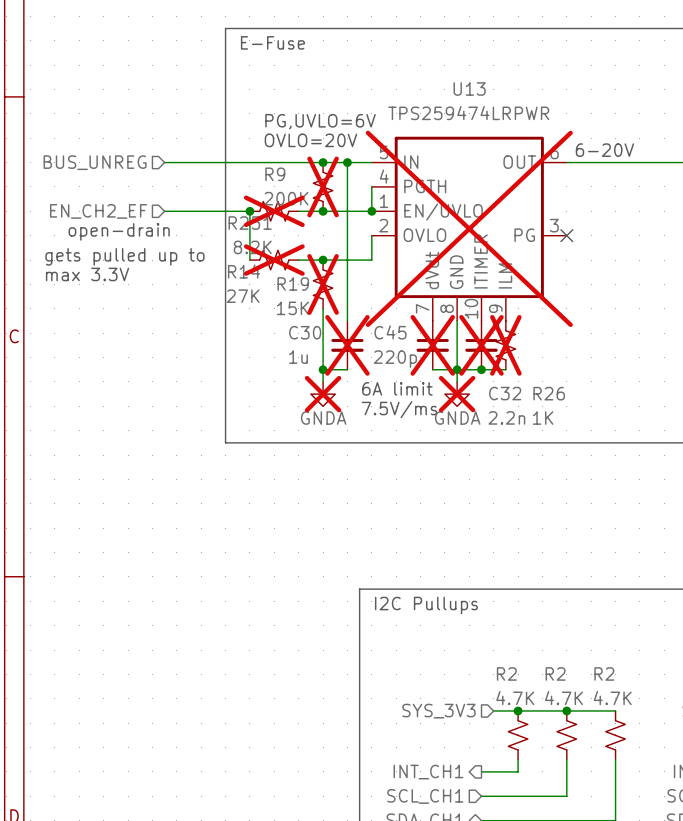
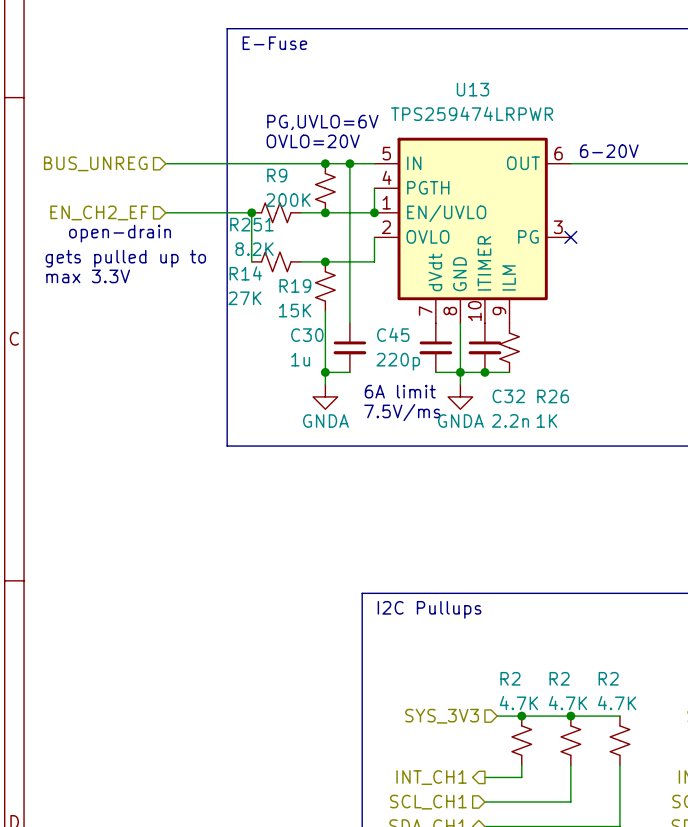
R9 do-not-place cross: (323, 186) -> none
R251 do-not-place cross: (274, 211) -> none
U13 do-not-place cross: (469, 228) -> none
R14 do-not-place cross: (274, 260) -> none
R19 do-not-place cross: (323, 284) -> none
C30 do-not-place cross: (347, 345) -> none
C45 do-not-place cross: (432, 345) -> none
C32 do-not-place cross: (481, 345) -> none
R26 do-not-place cross: (505, 345) -> none
power symbol do-not-place cross: (323, 394) -> none
power symbol do-not-place cross: (457, 394) -> none

